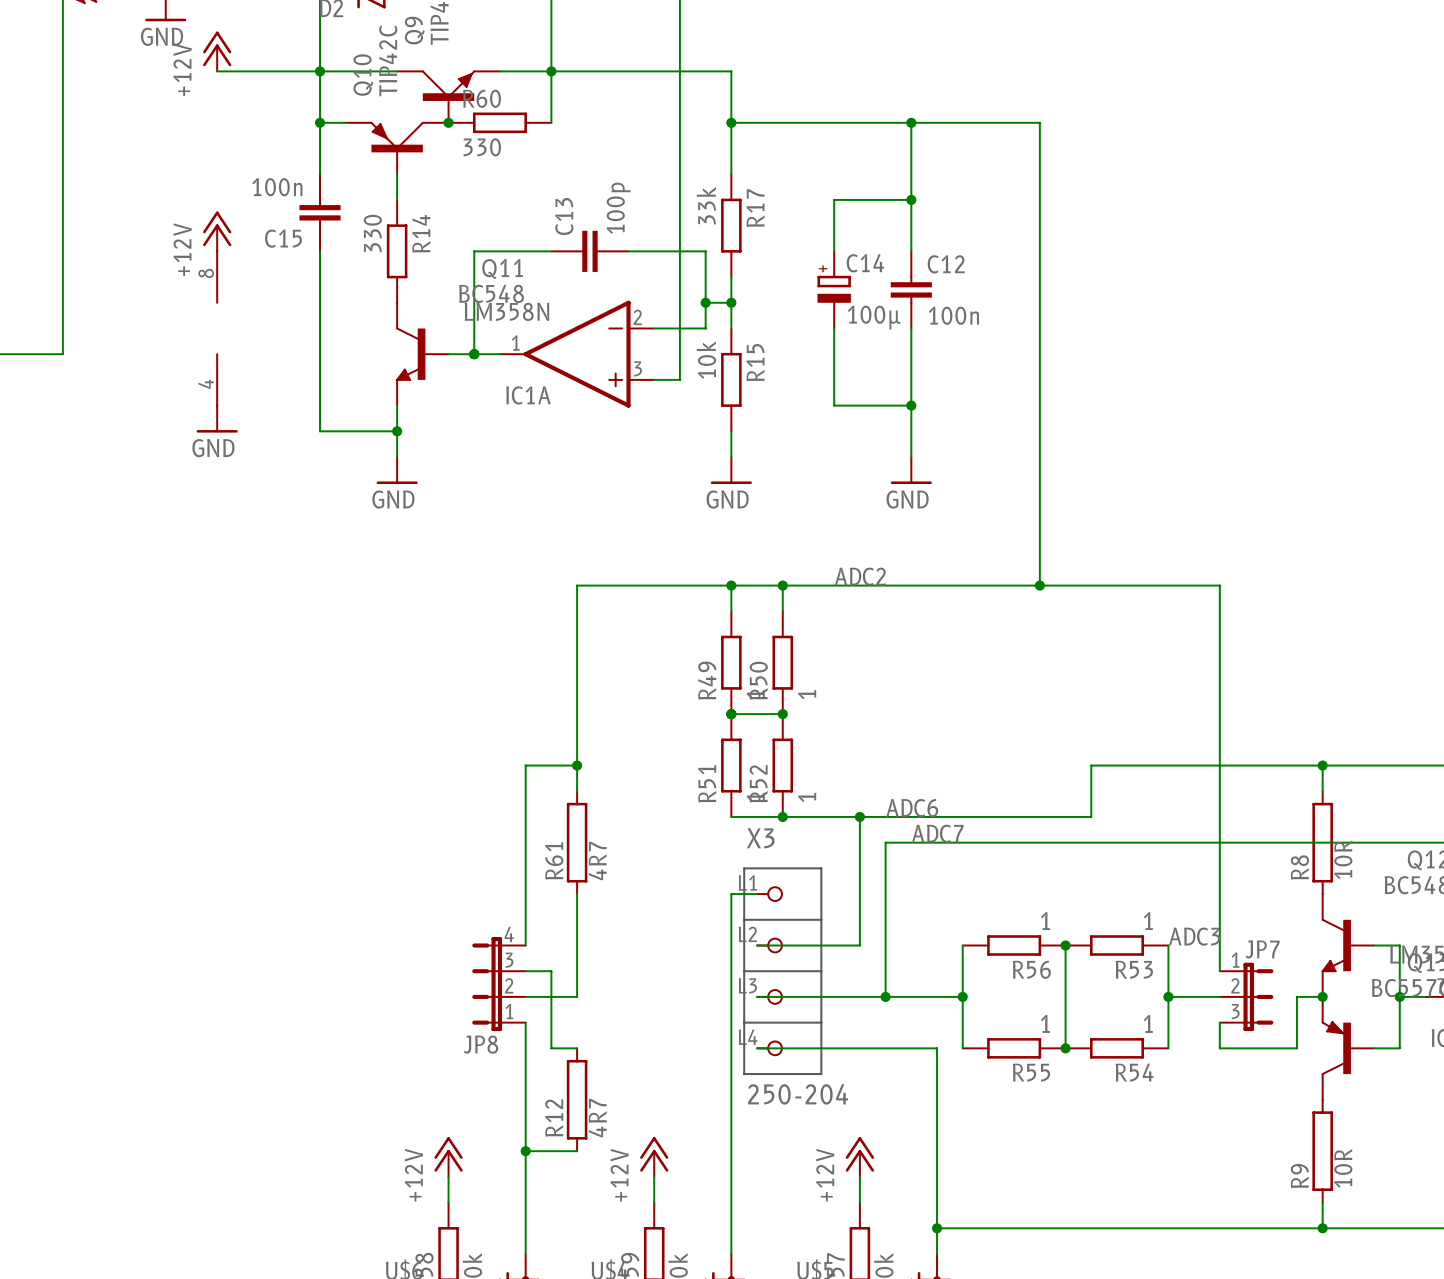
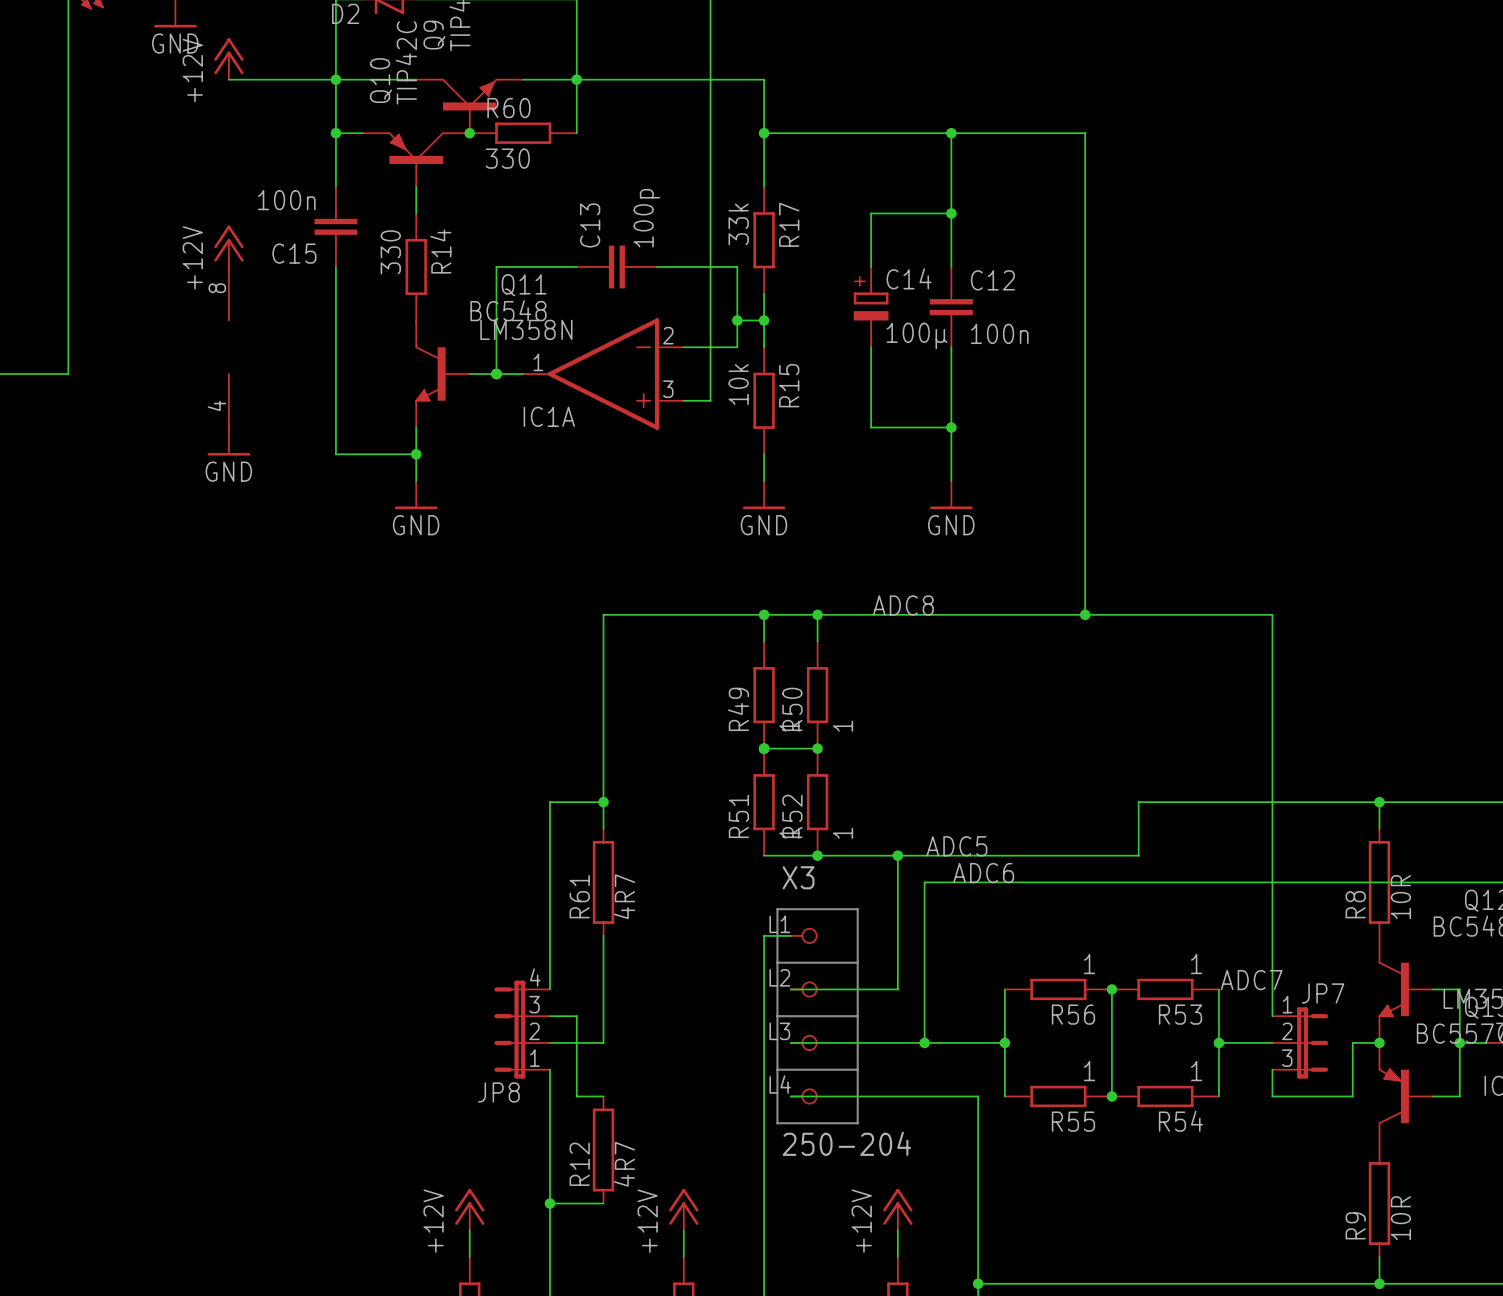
label: ADC2 (860, 576) -> ADC8 (903, 605)
label: ADC6 (912, 808) -> ADC5 (956, 846)
label: ADC7 (937, 833) -> ADC6 (983, 873)
label: ADC3 (1194, 936) -> ADC7 (1251, 980)

